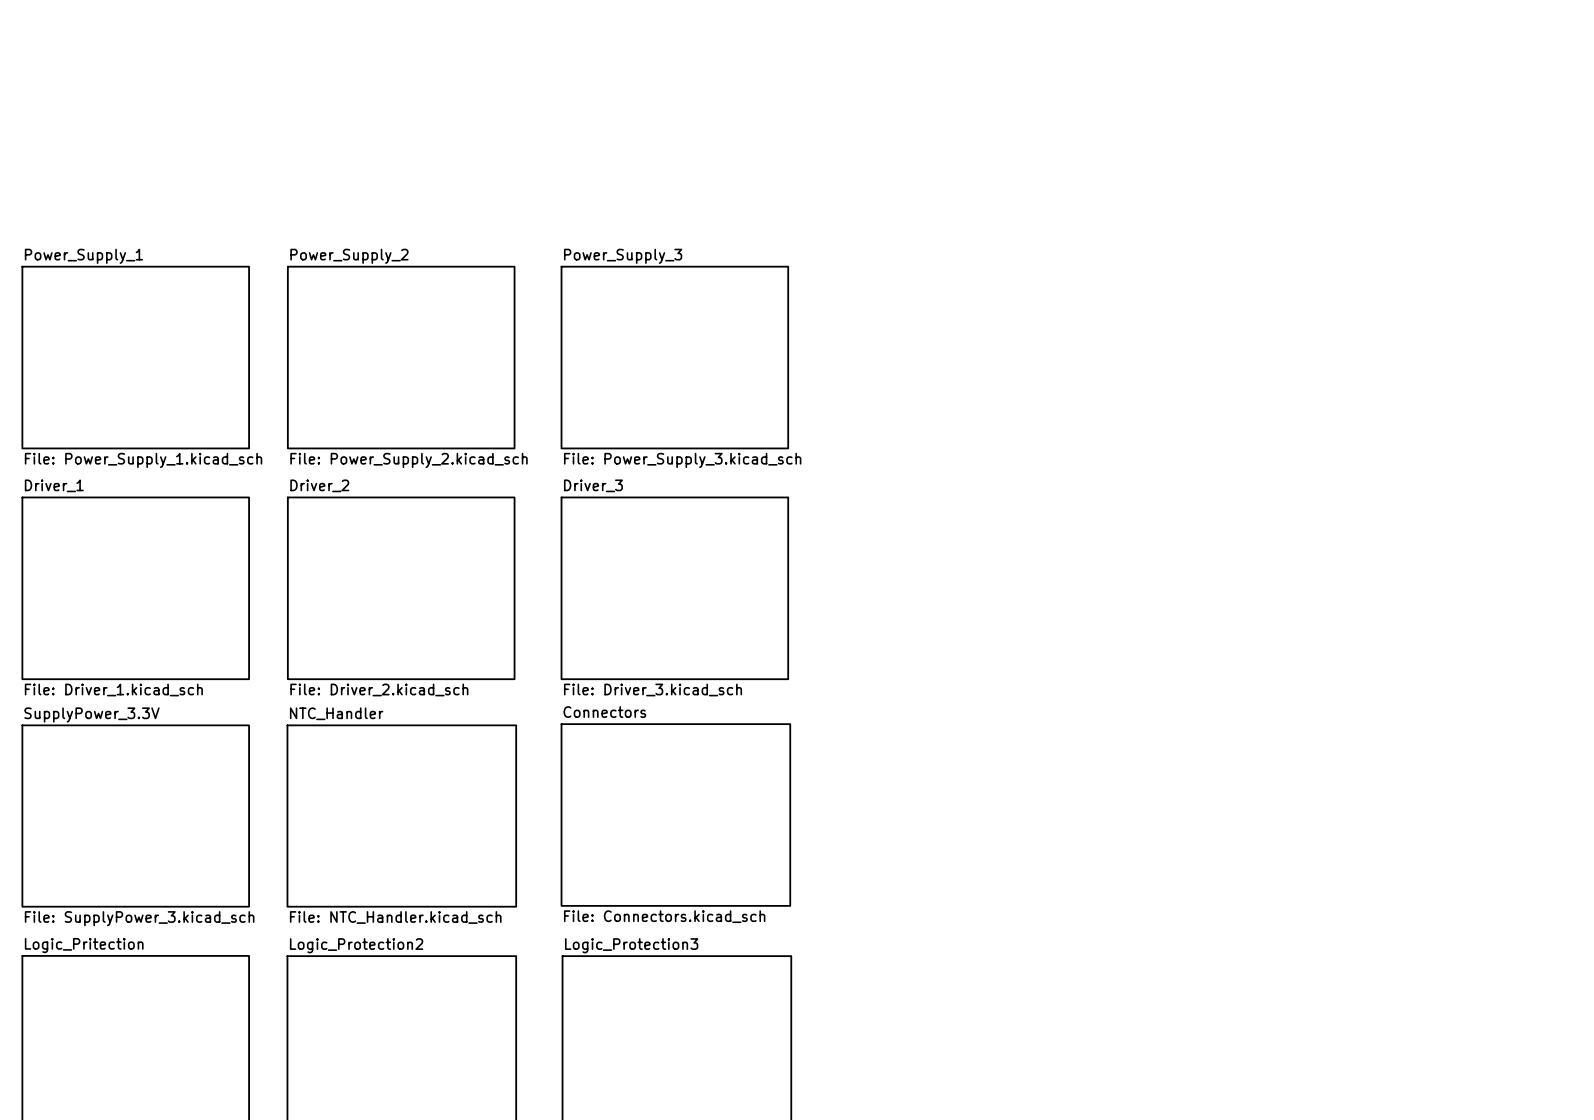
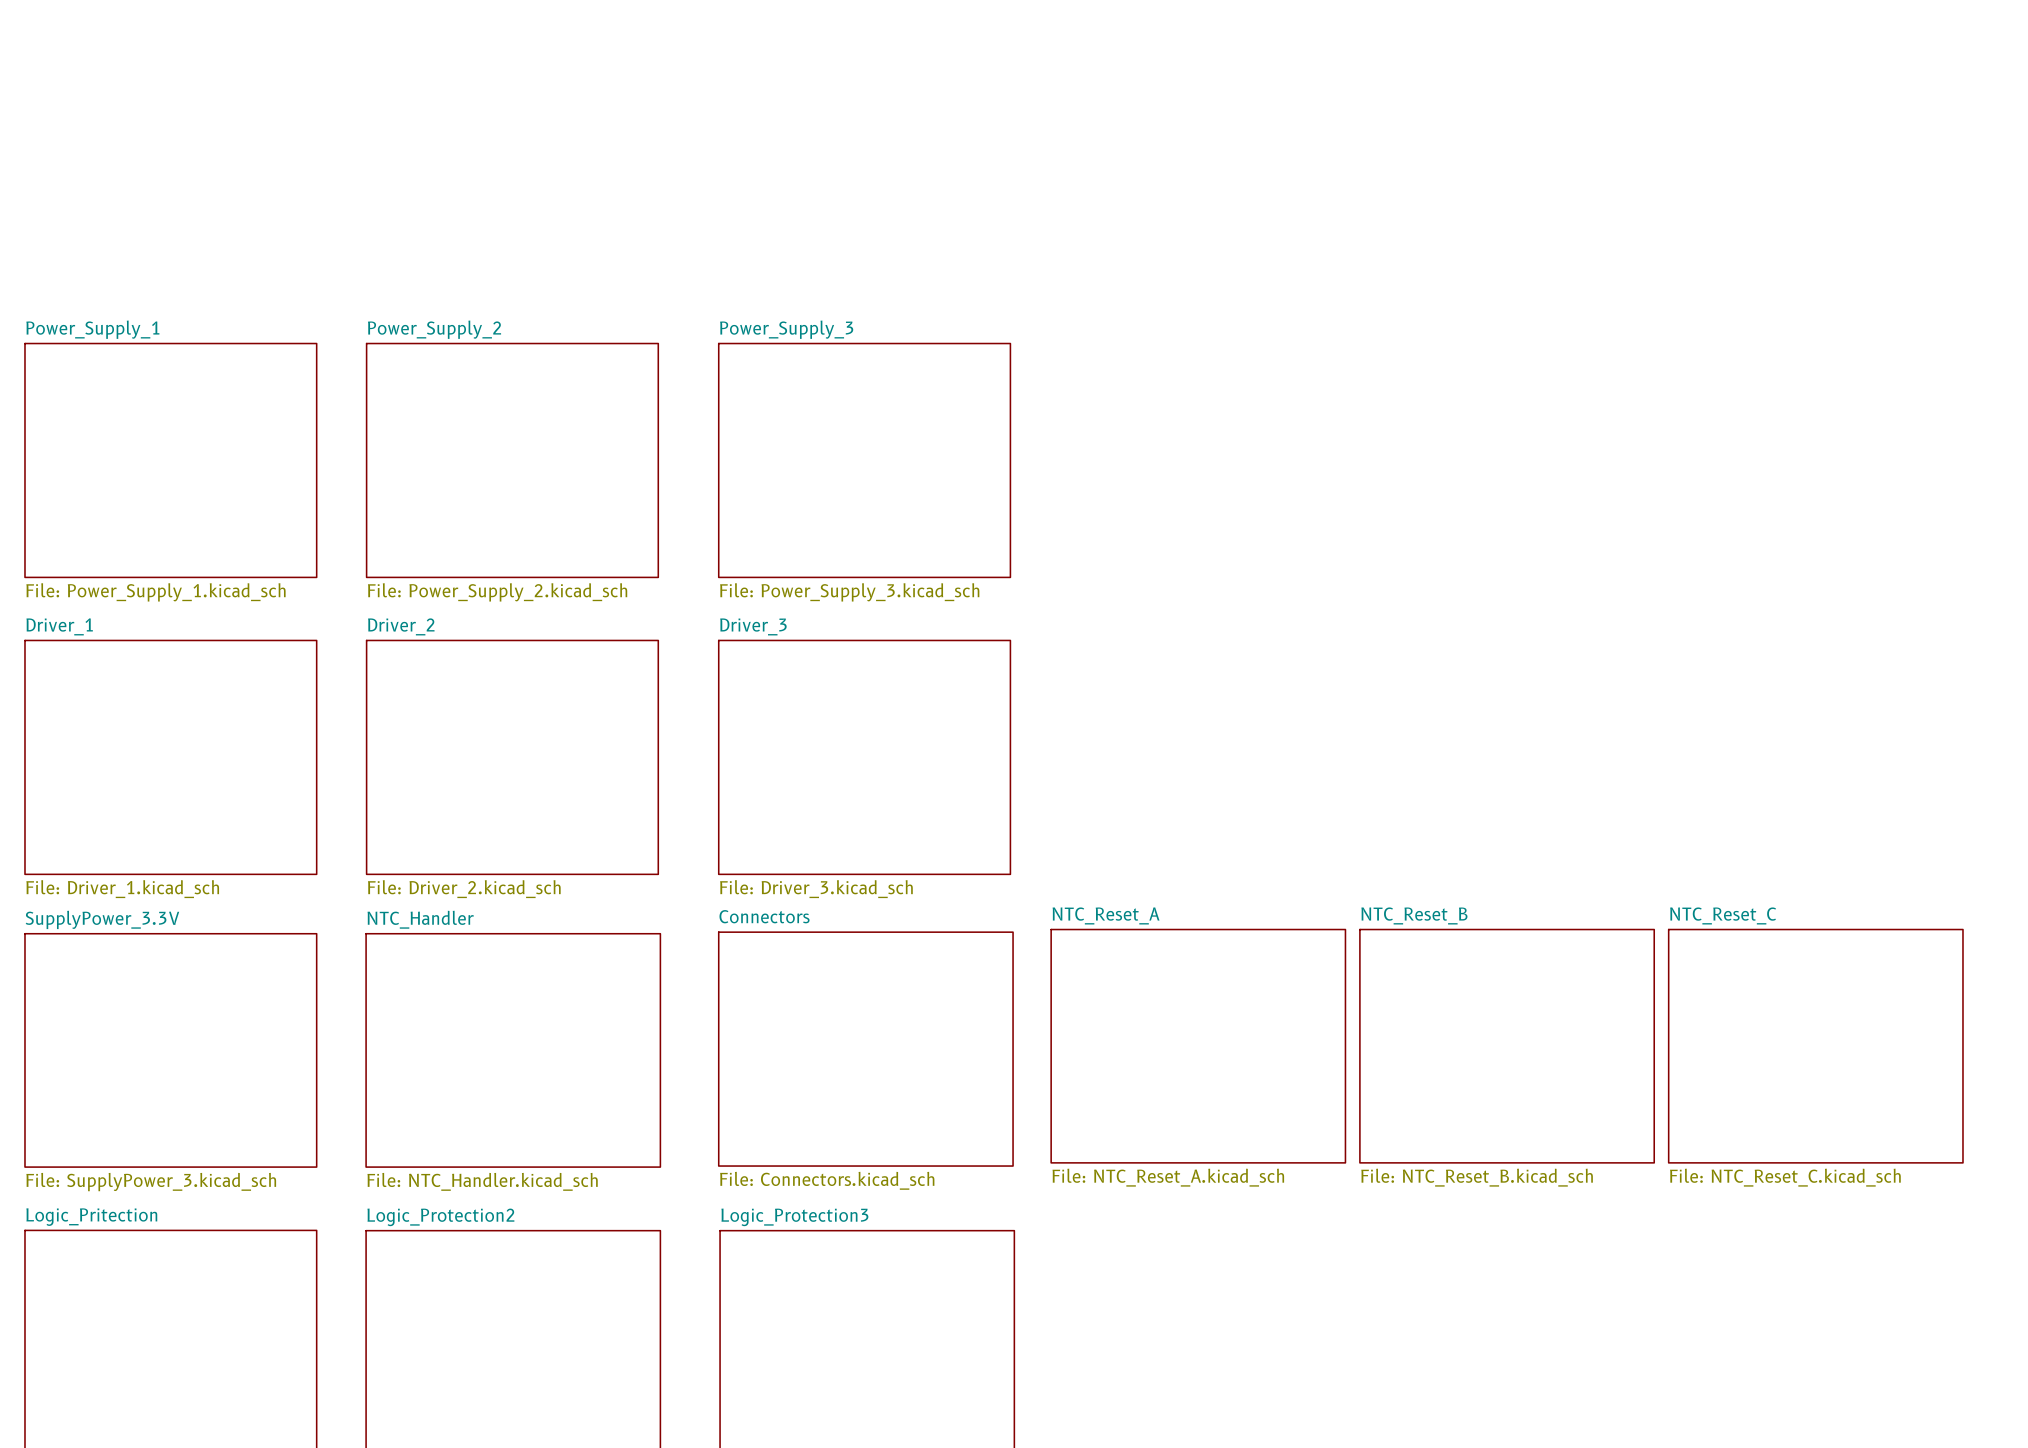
sheet NTC_Reset_A: none -> File: NTC_Reset_A.kicad_sch (1198, 1046)
sheet NTC_Reset_B: none -> File: NTC_Reset_B.kicad_sch (1507, 1046)
sheet NTC_Reset_C: none -> File: NTC_Reset_C.kicad_sch (1815, 1046)

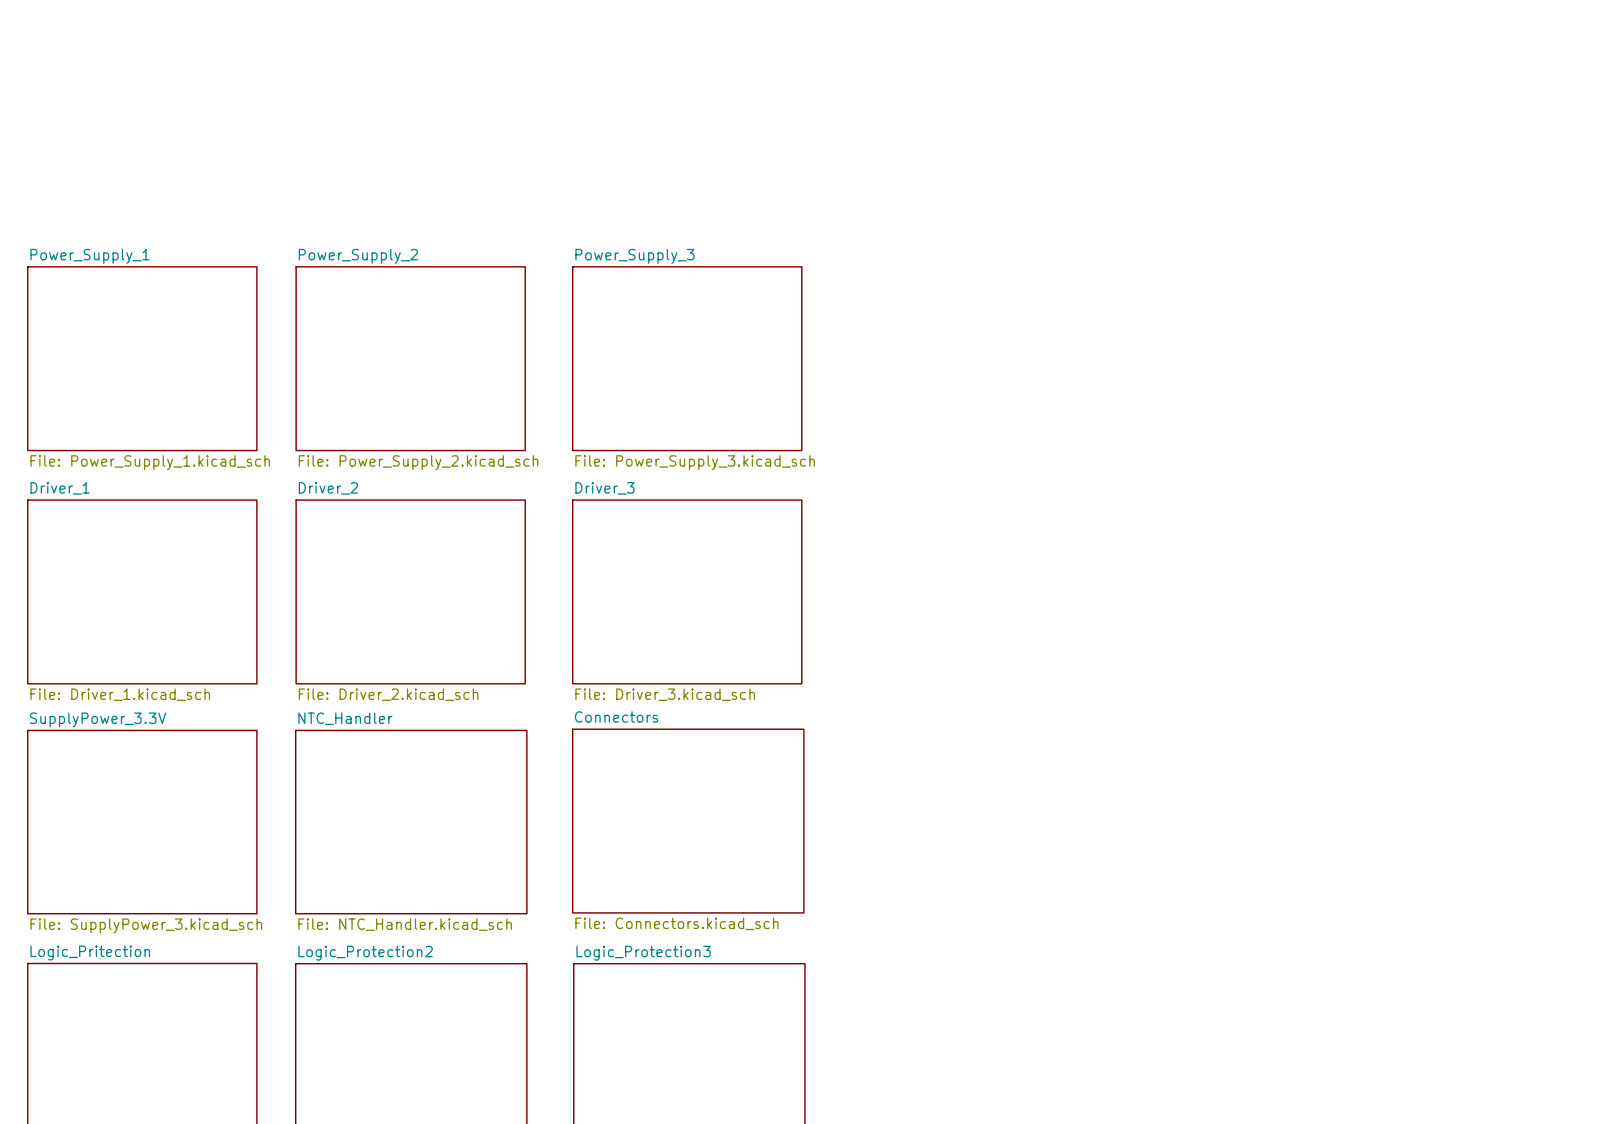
sheet NTC_Reset_A: File: NTC_Reset_A.kicad_sch (1198, 1046) -> none
sheet NTC_Reset_B: File: NTC_Reset_B.kicad_sch (1507, 1046) -> none
sheet NTC_Reset_C: File: NTC_Reset_C.kicad_sch (1815, 1046) -> none

